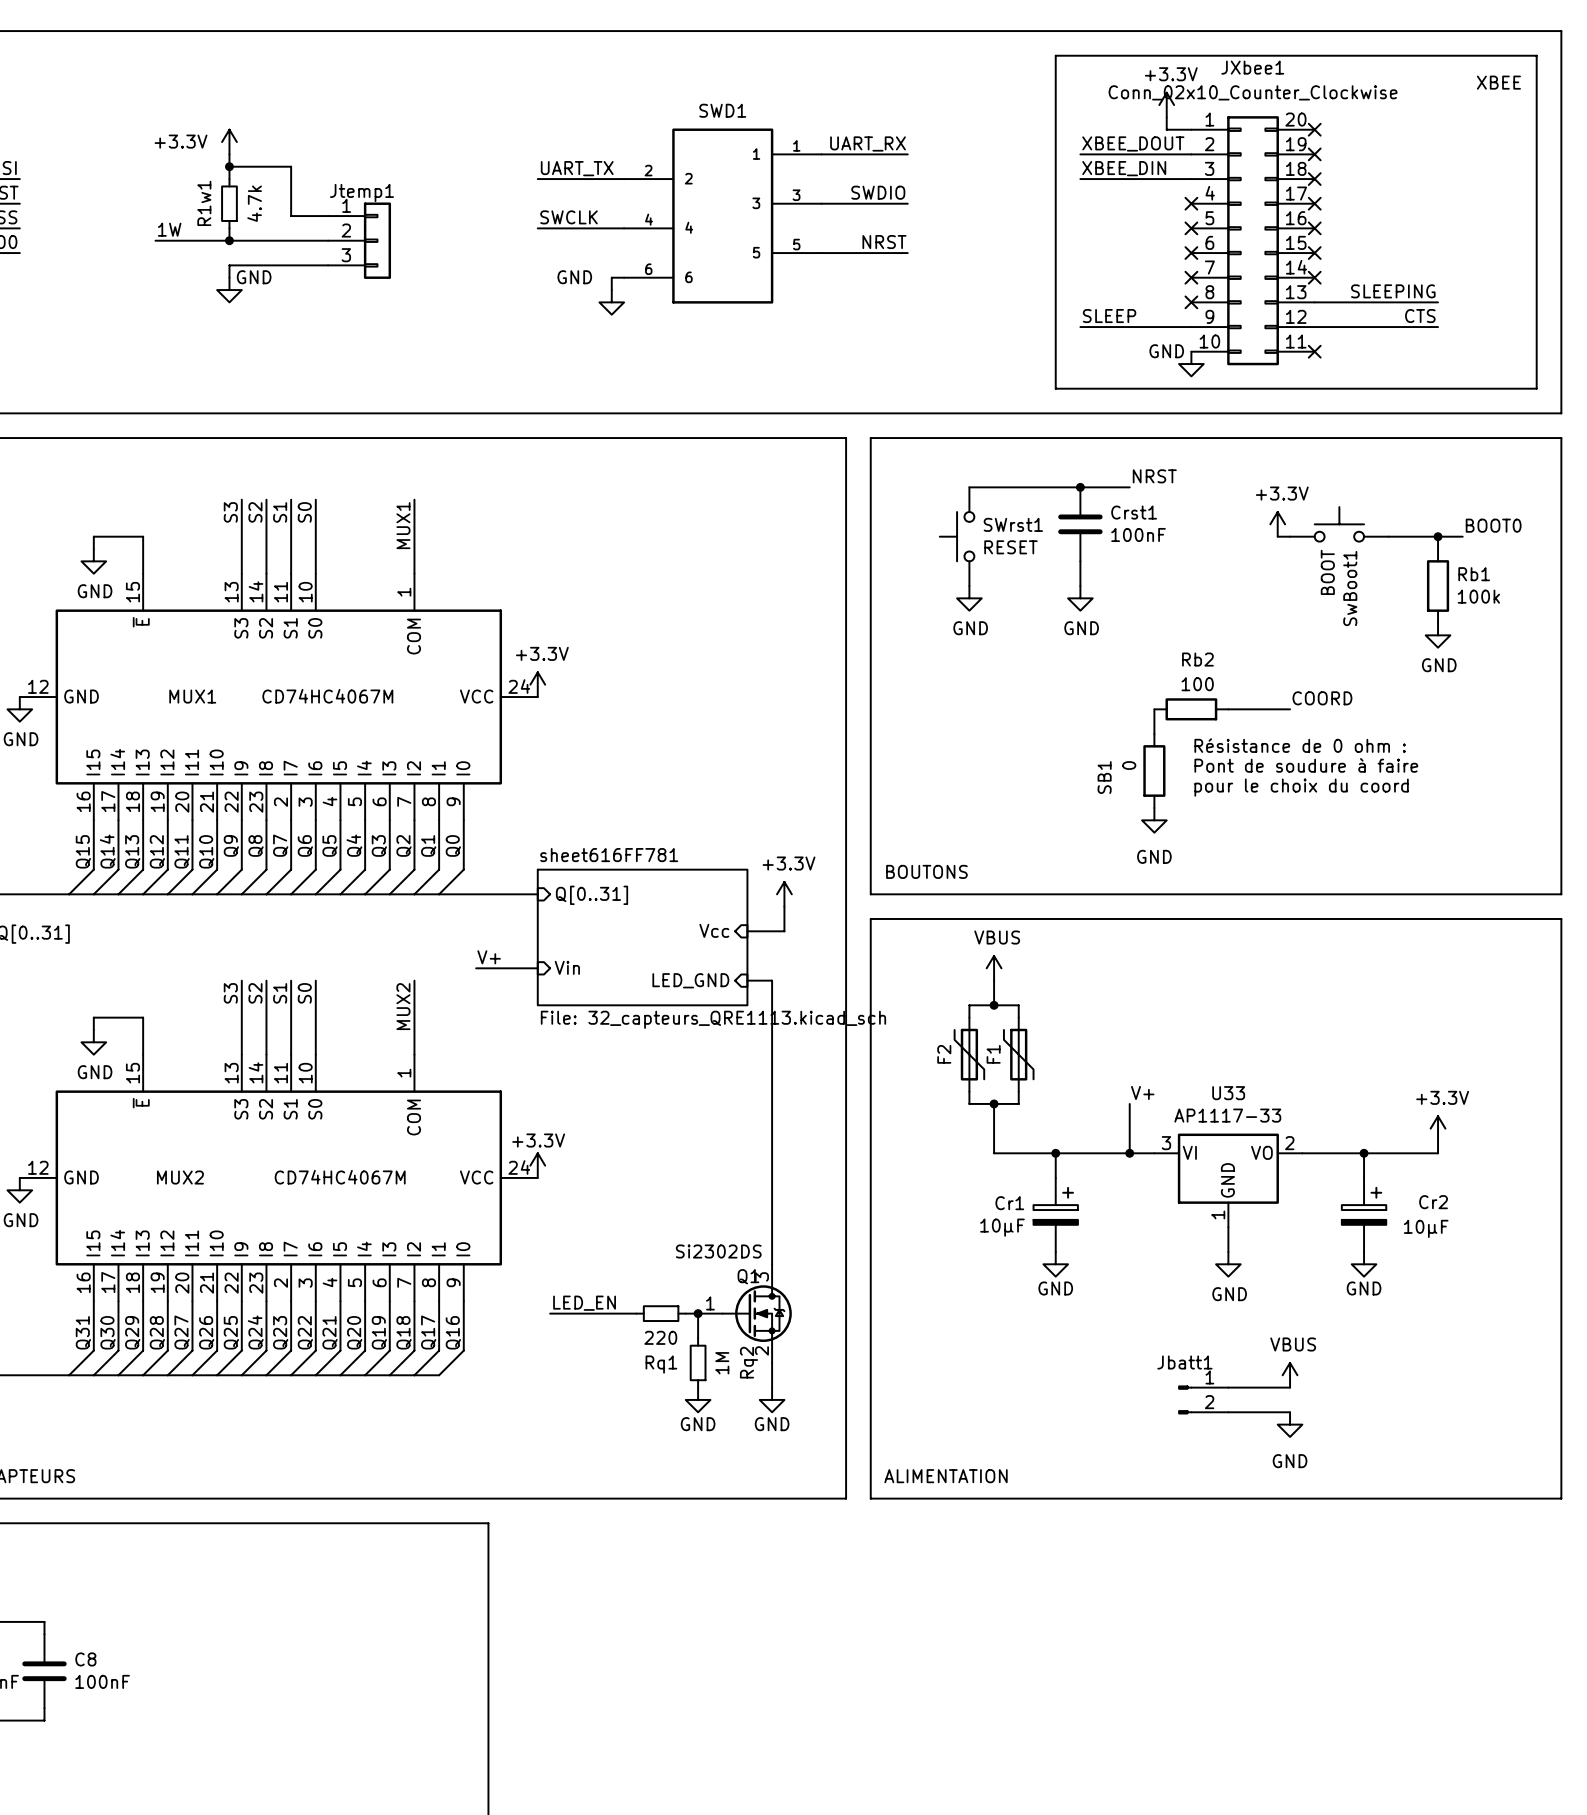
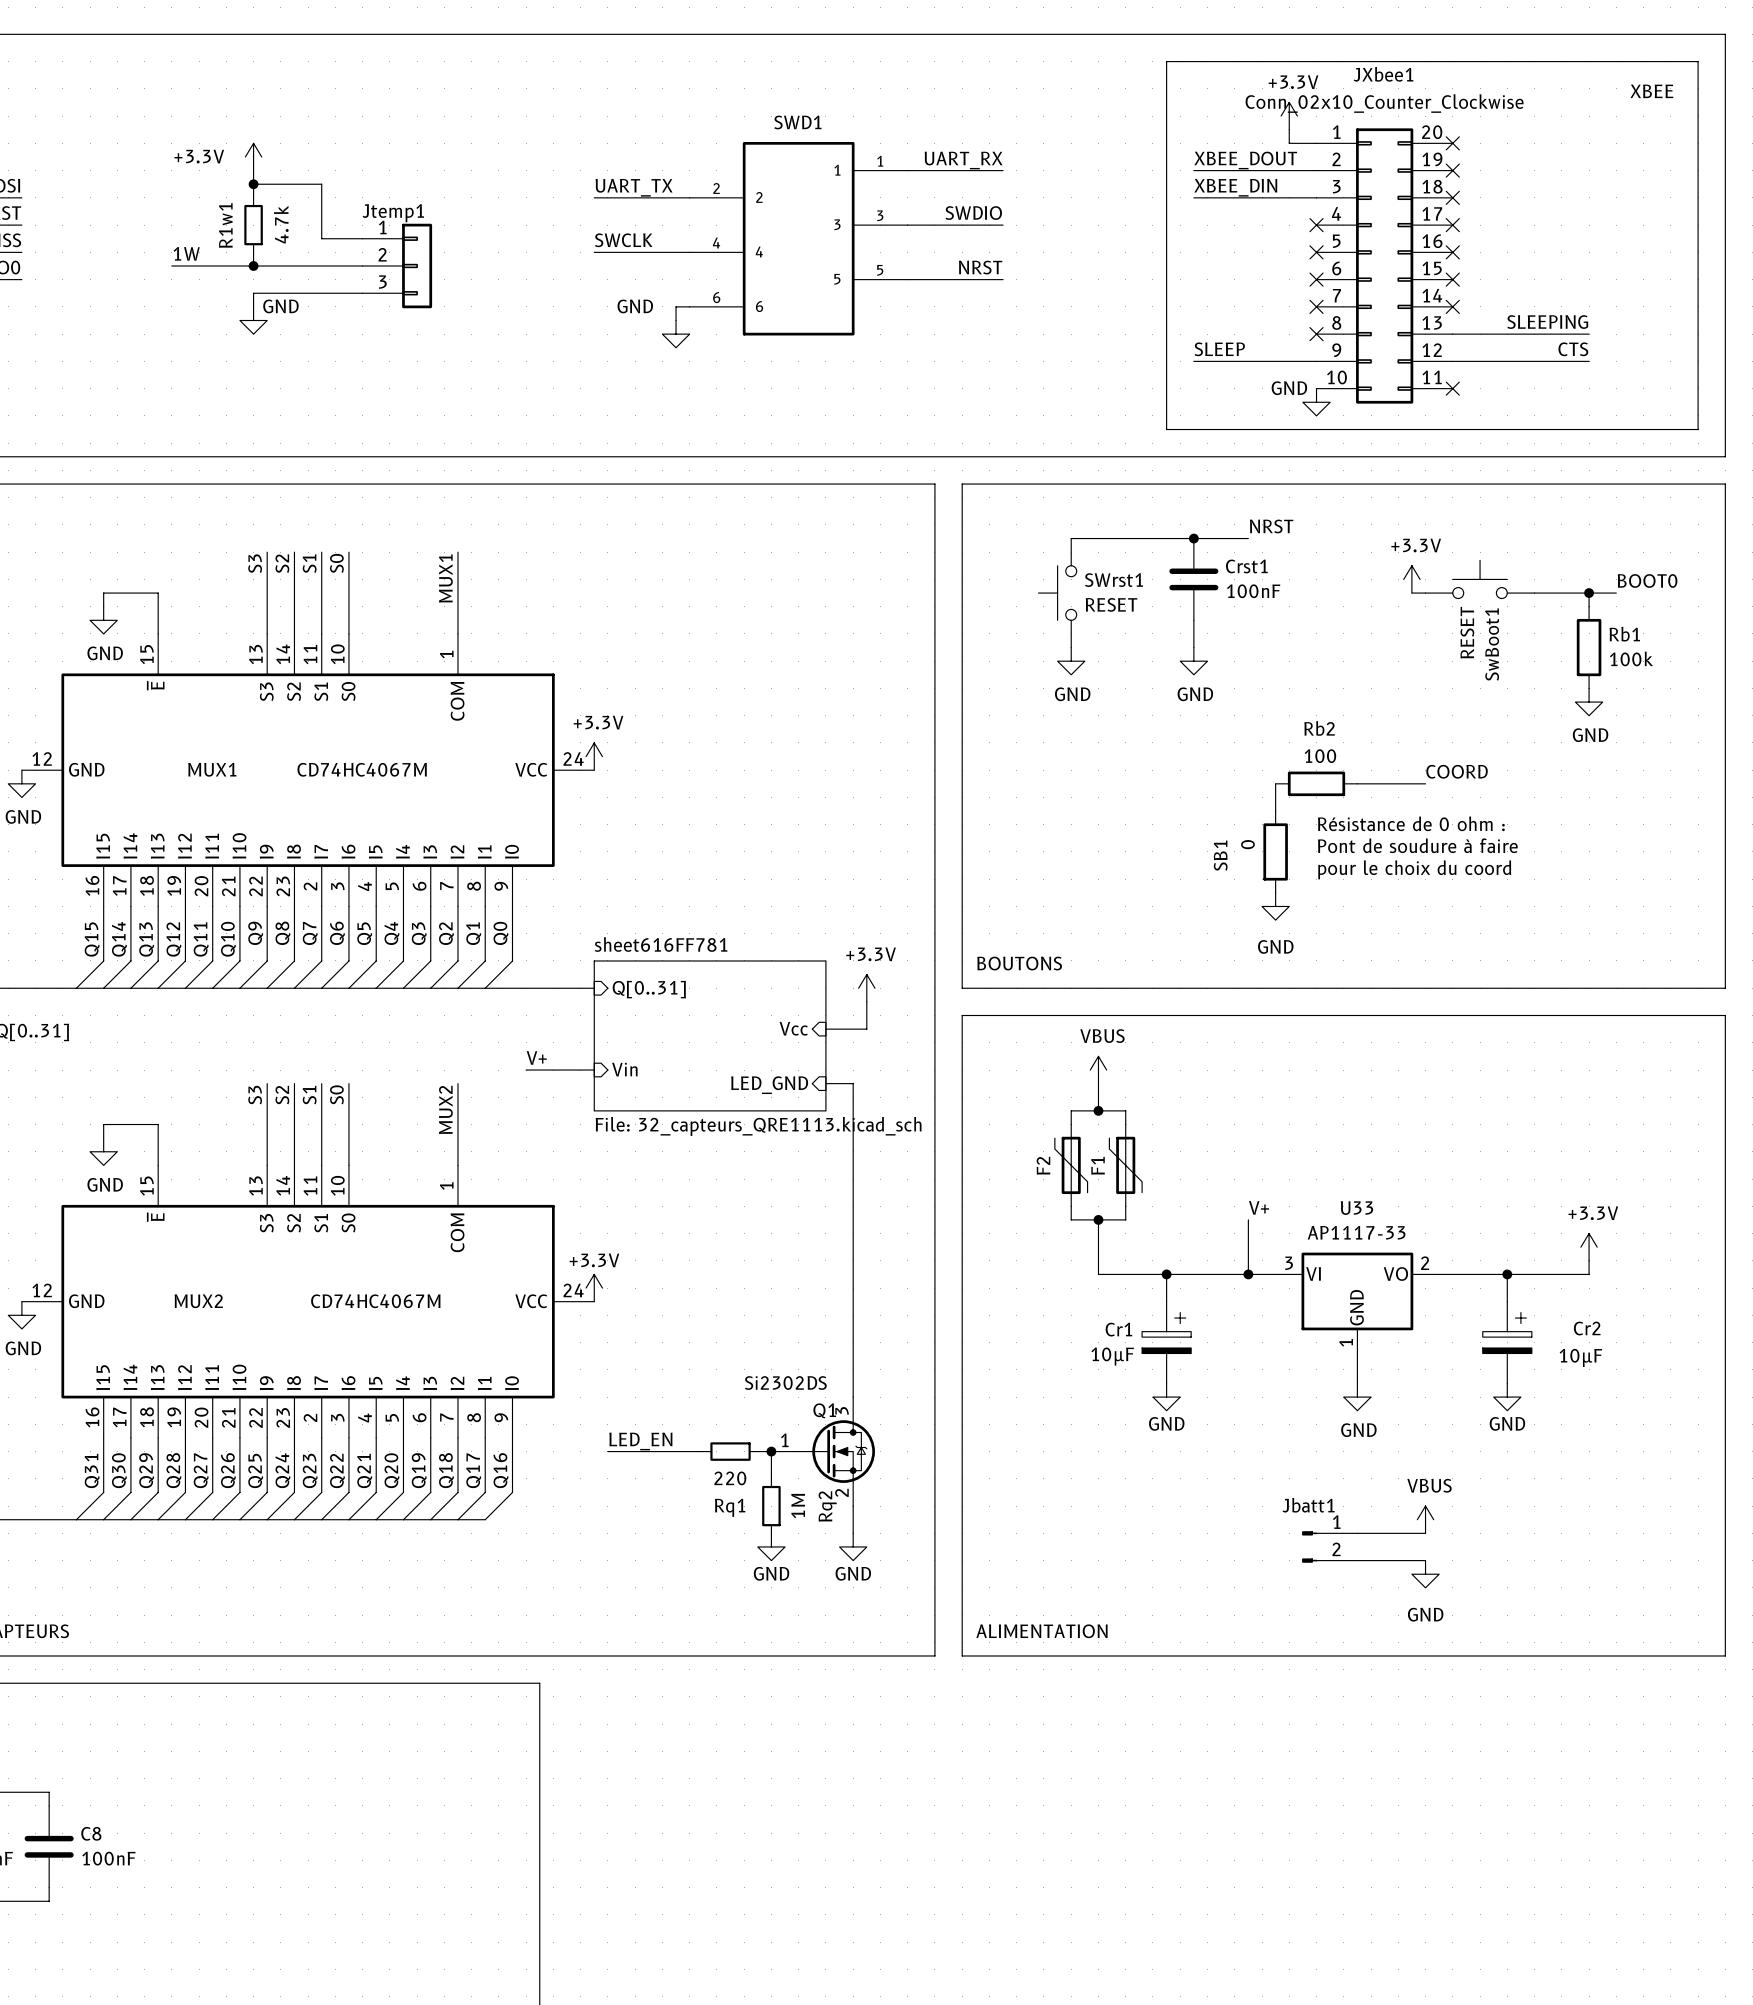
SwBoot1 value: BOOT (1327, 572) -> RESET (1467, 632)

